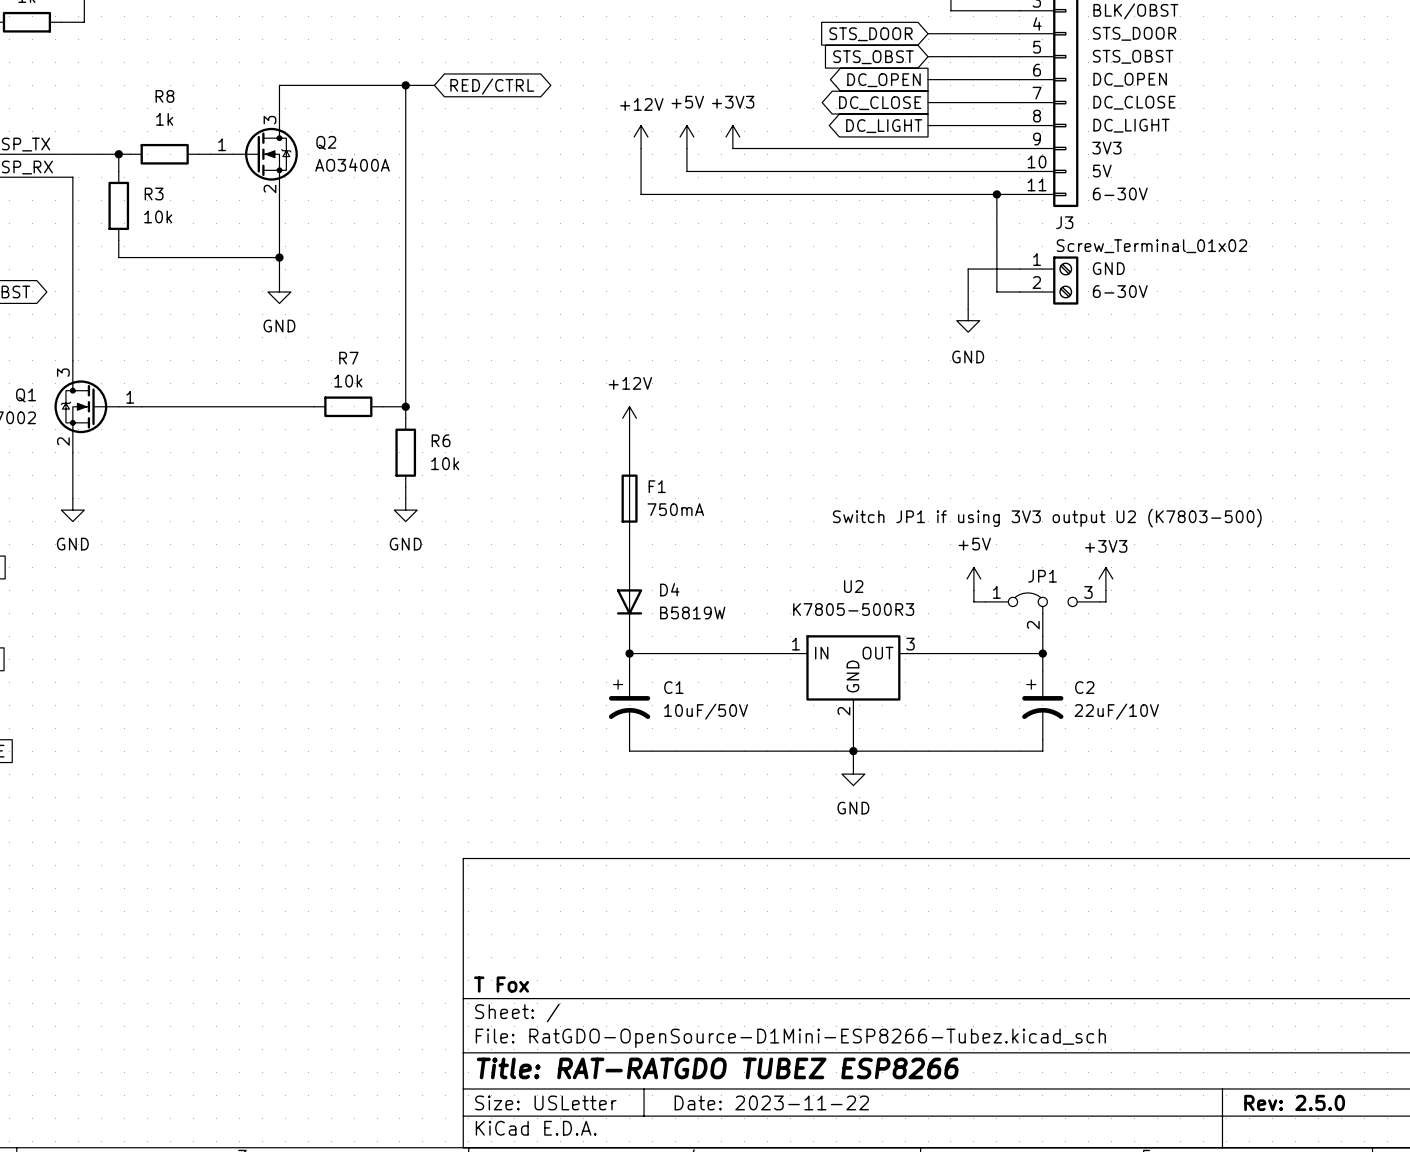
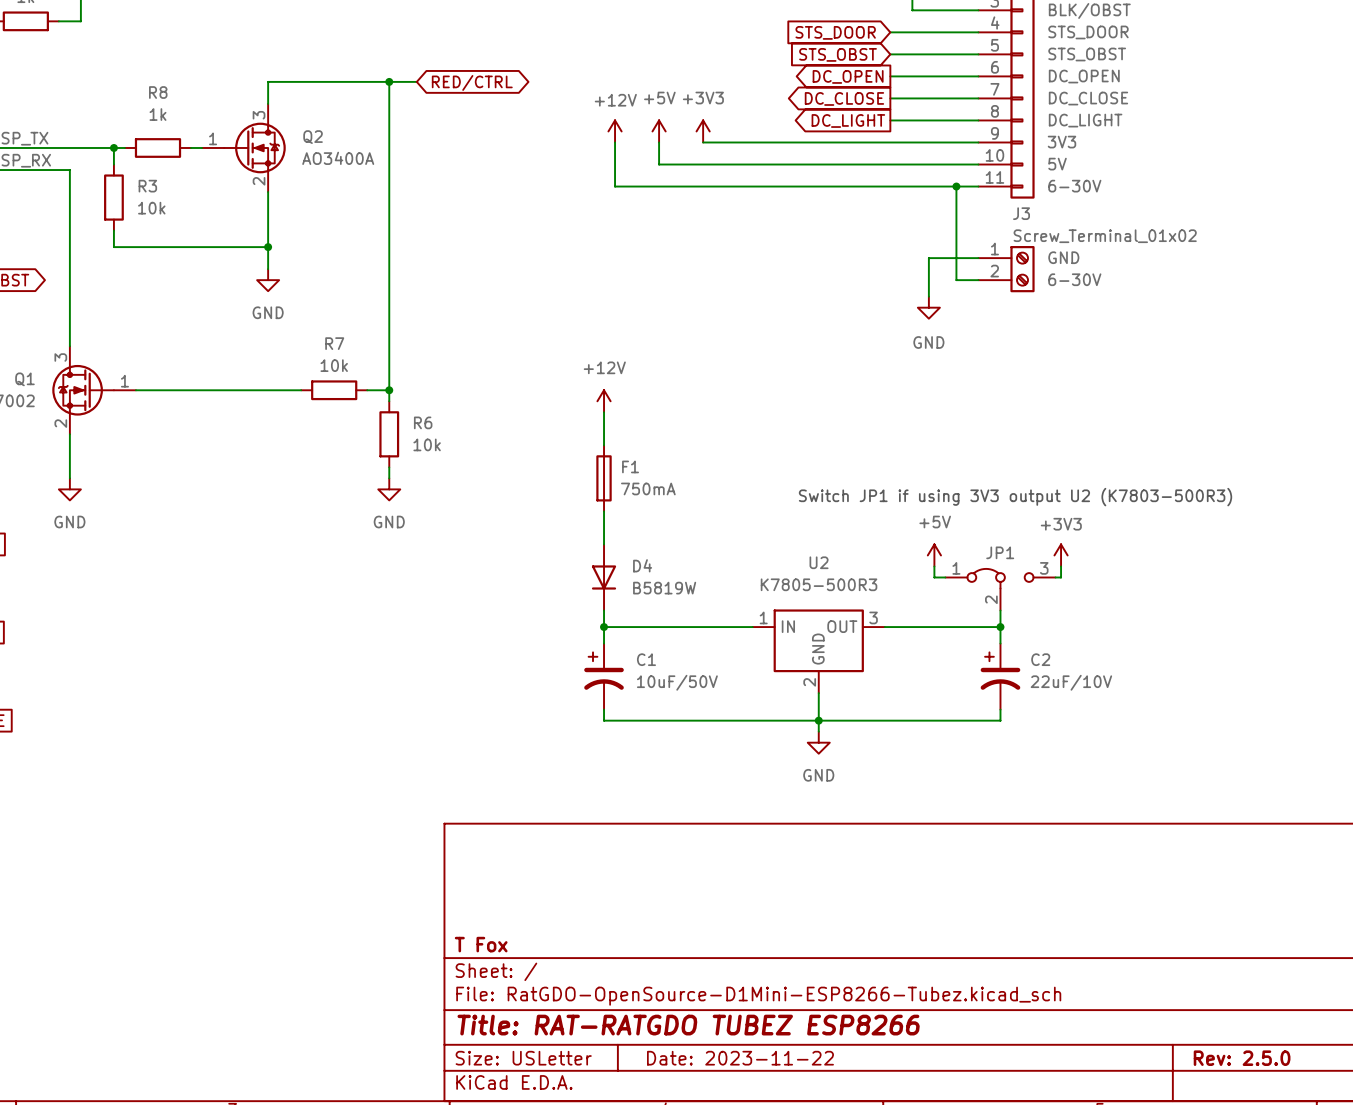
text: Switch JP1 if using 3V3 output U2 (K7803-500) (1047, 518) -> Switch JP1 if using 3V3 output U2 (K7803-500R3) (1015, 497)

